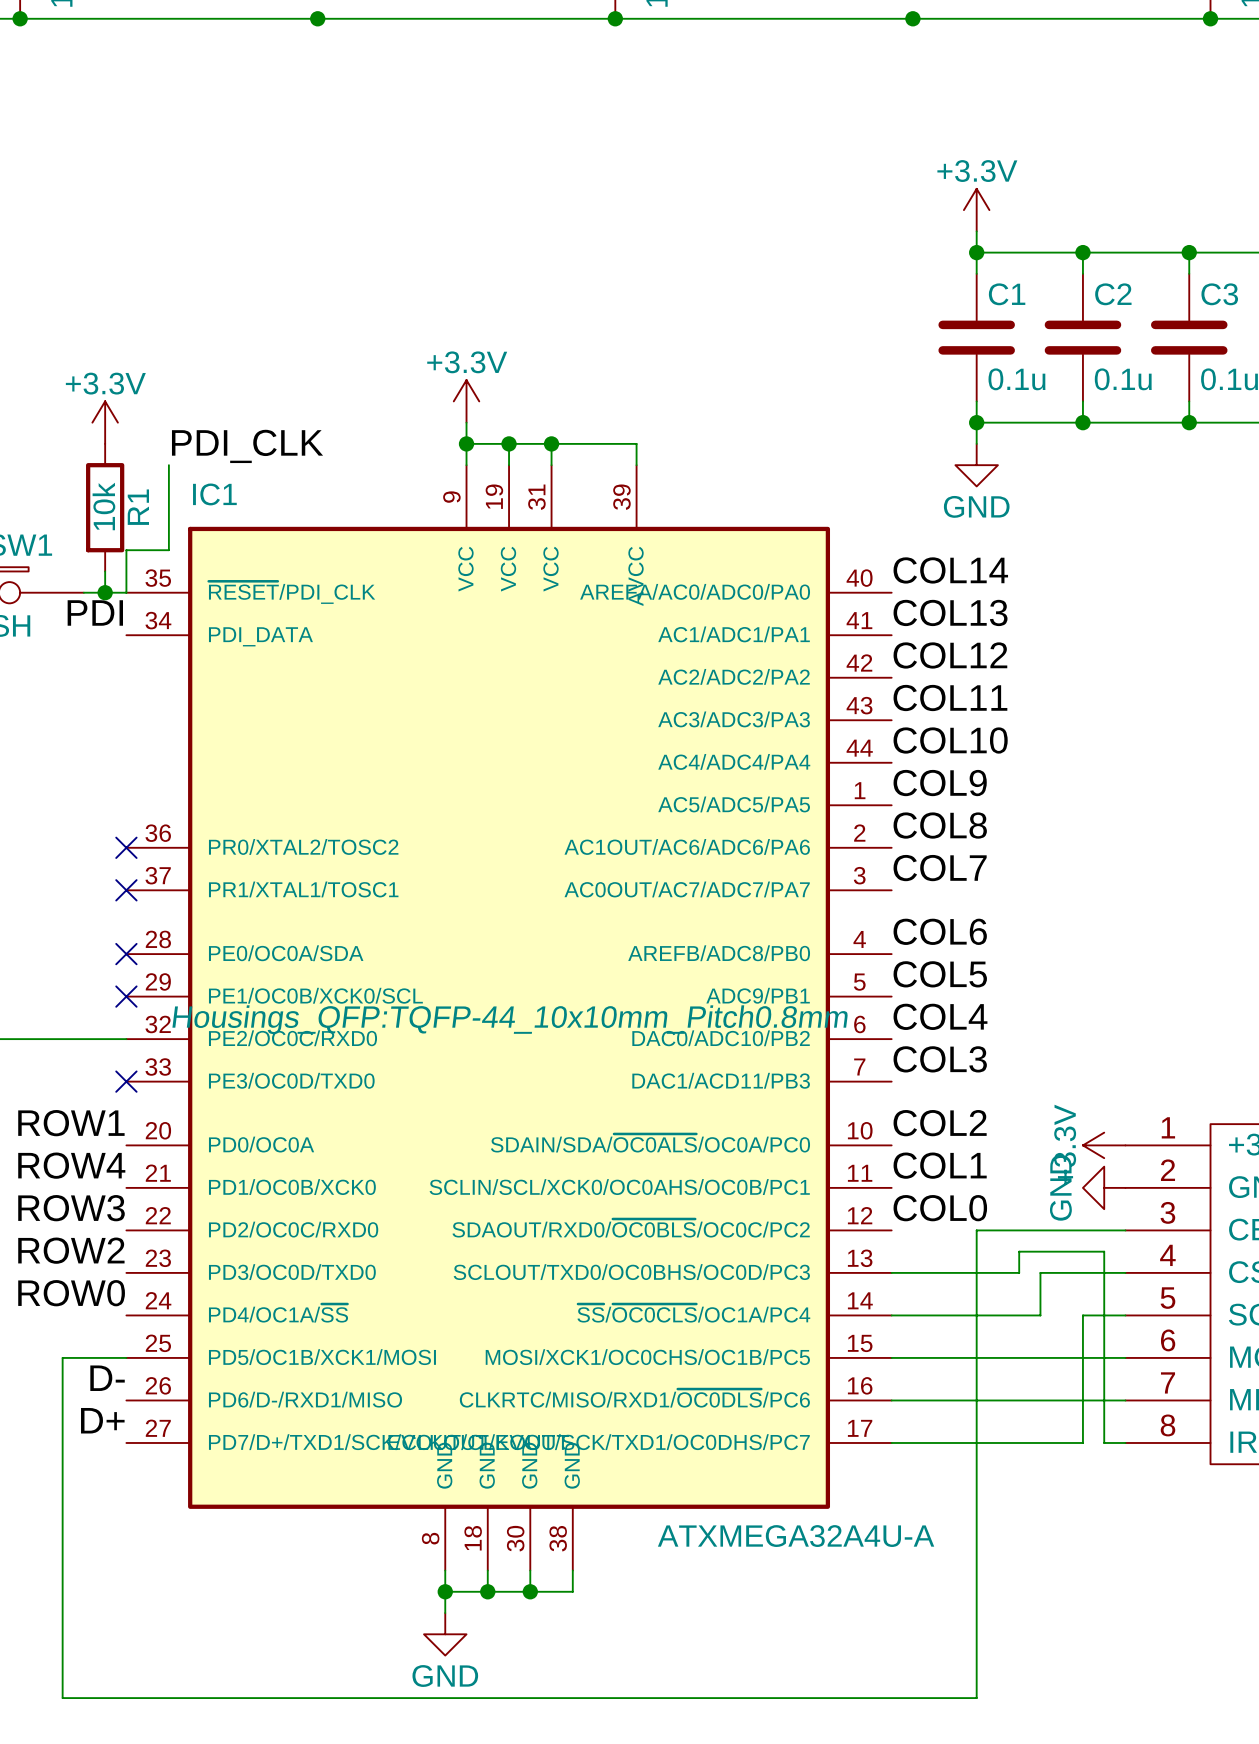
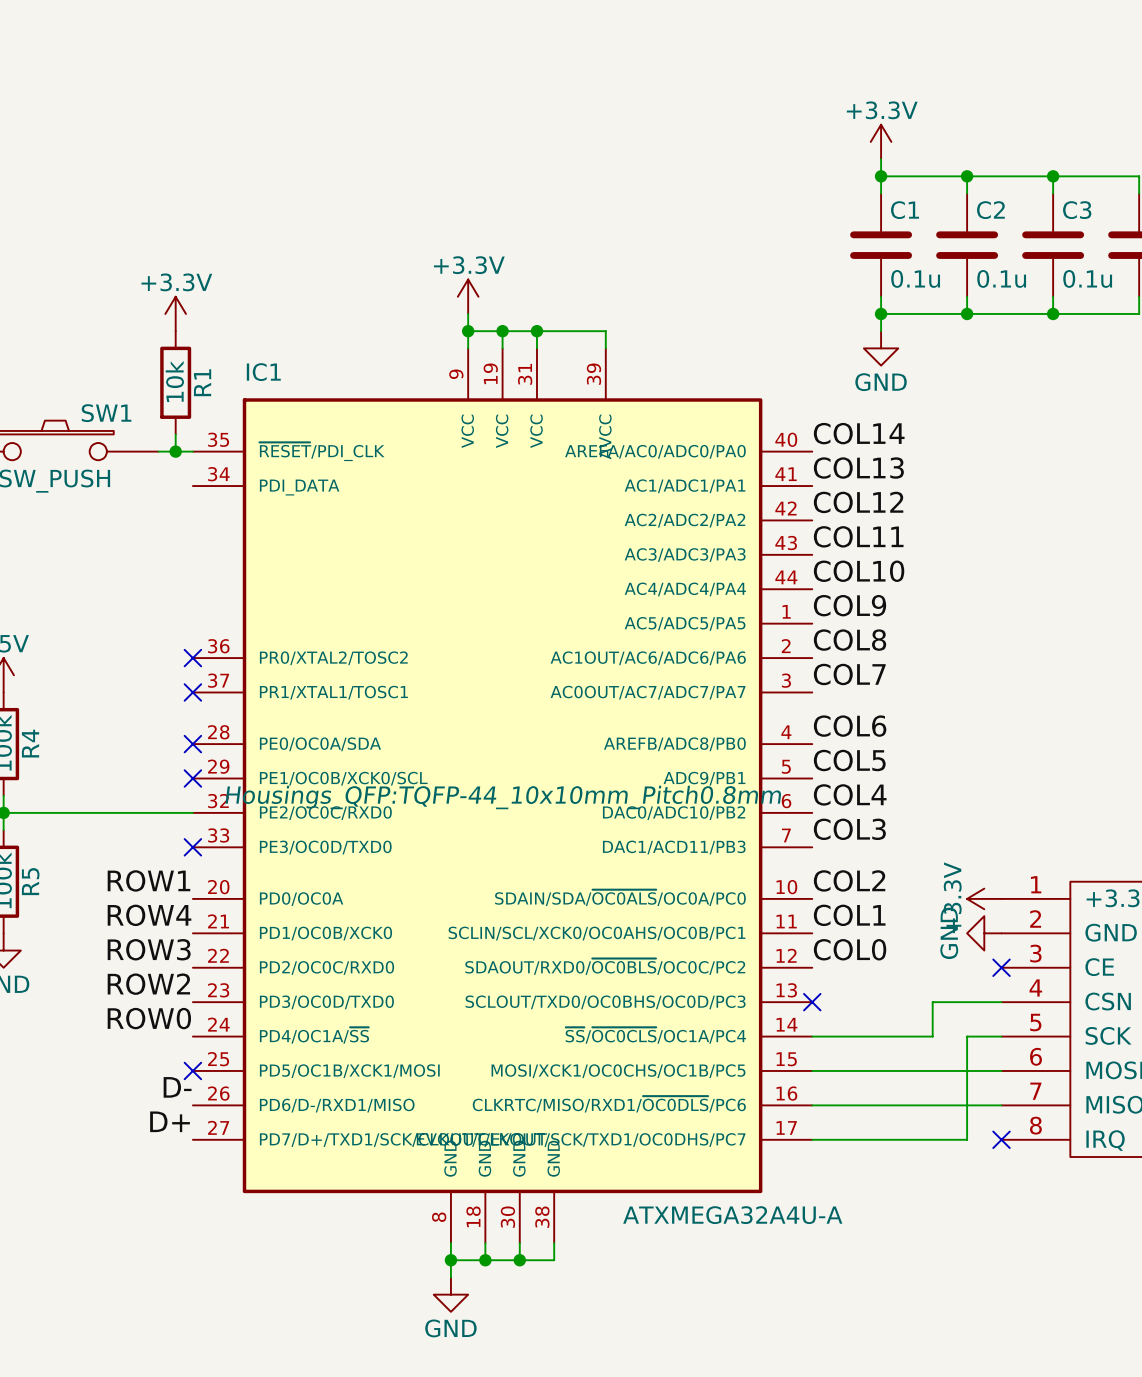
label: PDI_CLK (247, 446) -> none
wire: (168, 465) (168, 550) (126, 550) (126, 592) -> none
label: PDI (95, 612) -> none
wire: (1125, 1230) (976, 1230) (976, 1698) (62, 1698) (62, 1357) (126, 1357) -> none
no-connect mark: none -> (1001, 967)
wire: (891, 1272) (1019, 1272) (1019, 1251) (1104, 1251) (1104, 1442) (1125, 1442) -> none
no-connect mark: none -> (812, 1002)
no-connect mark: none -> (192, 1070)
no-connect mark: none -> (1001, 1139)

